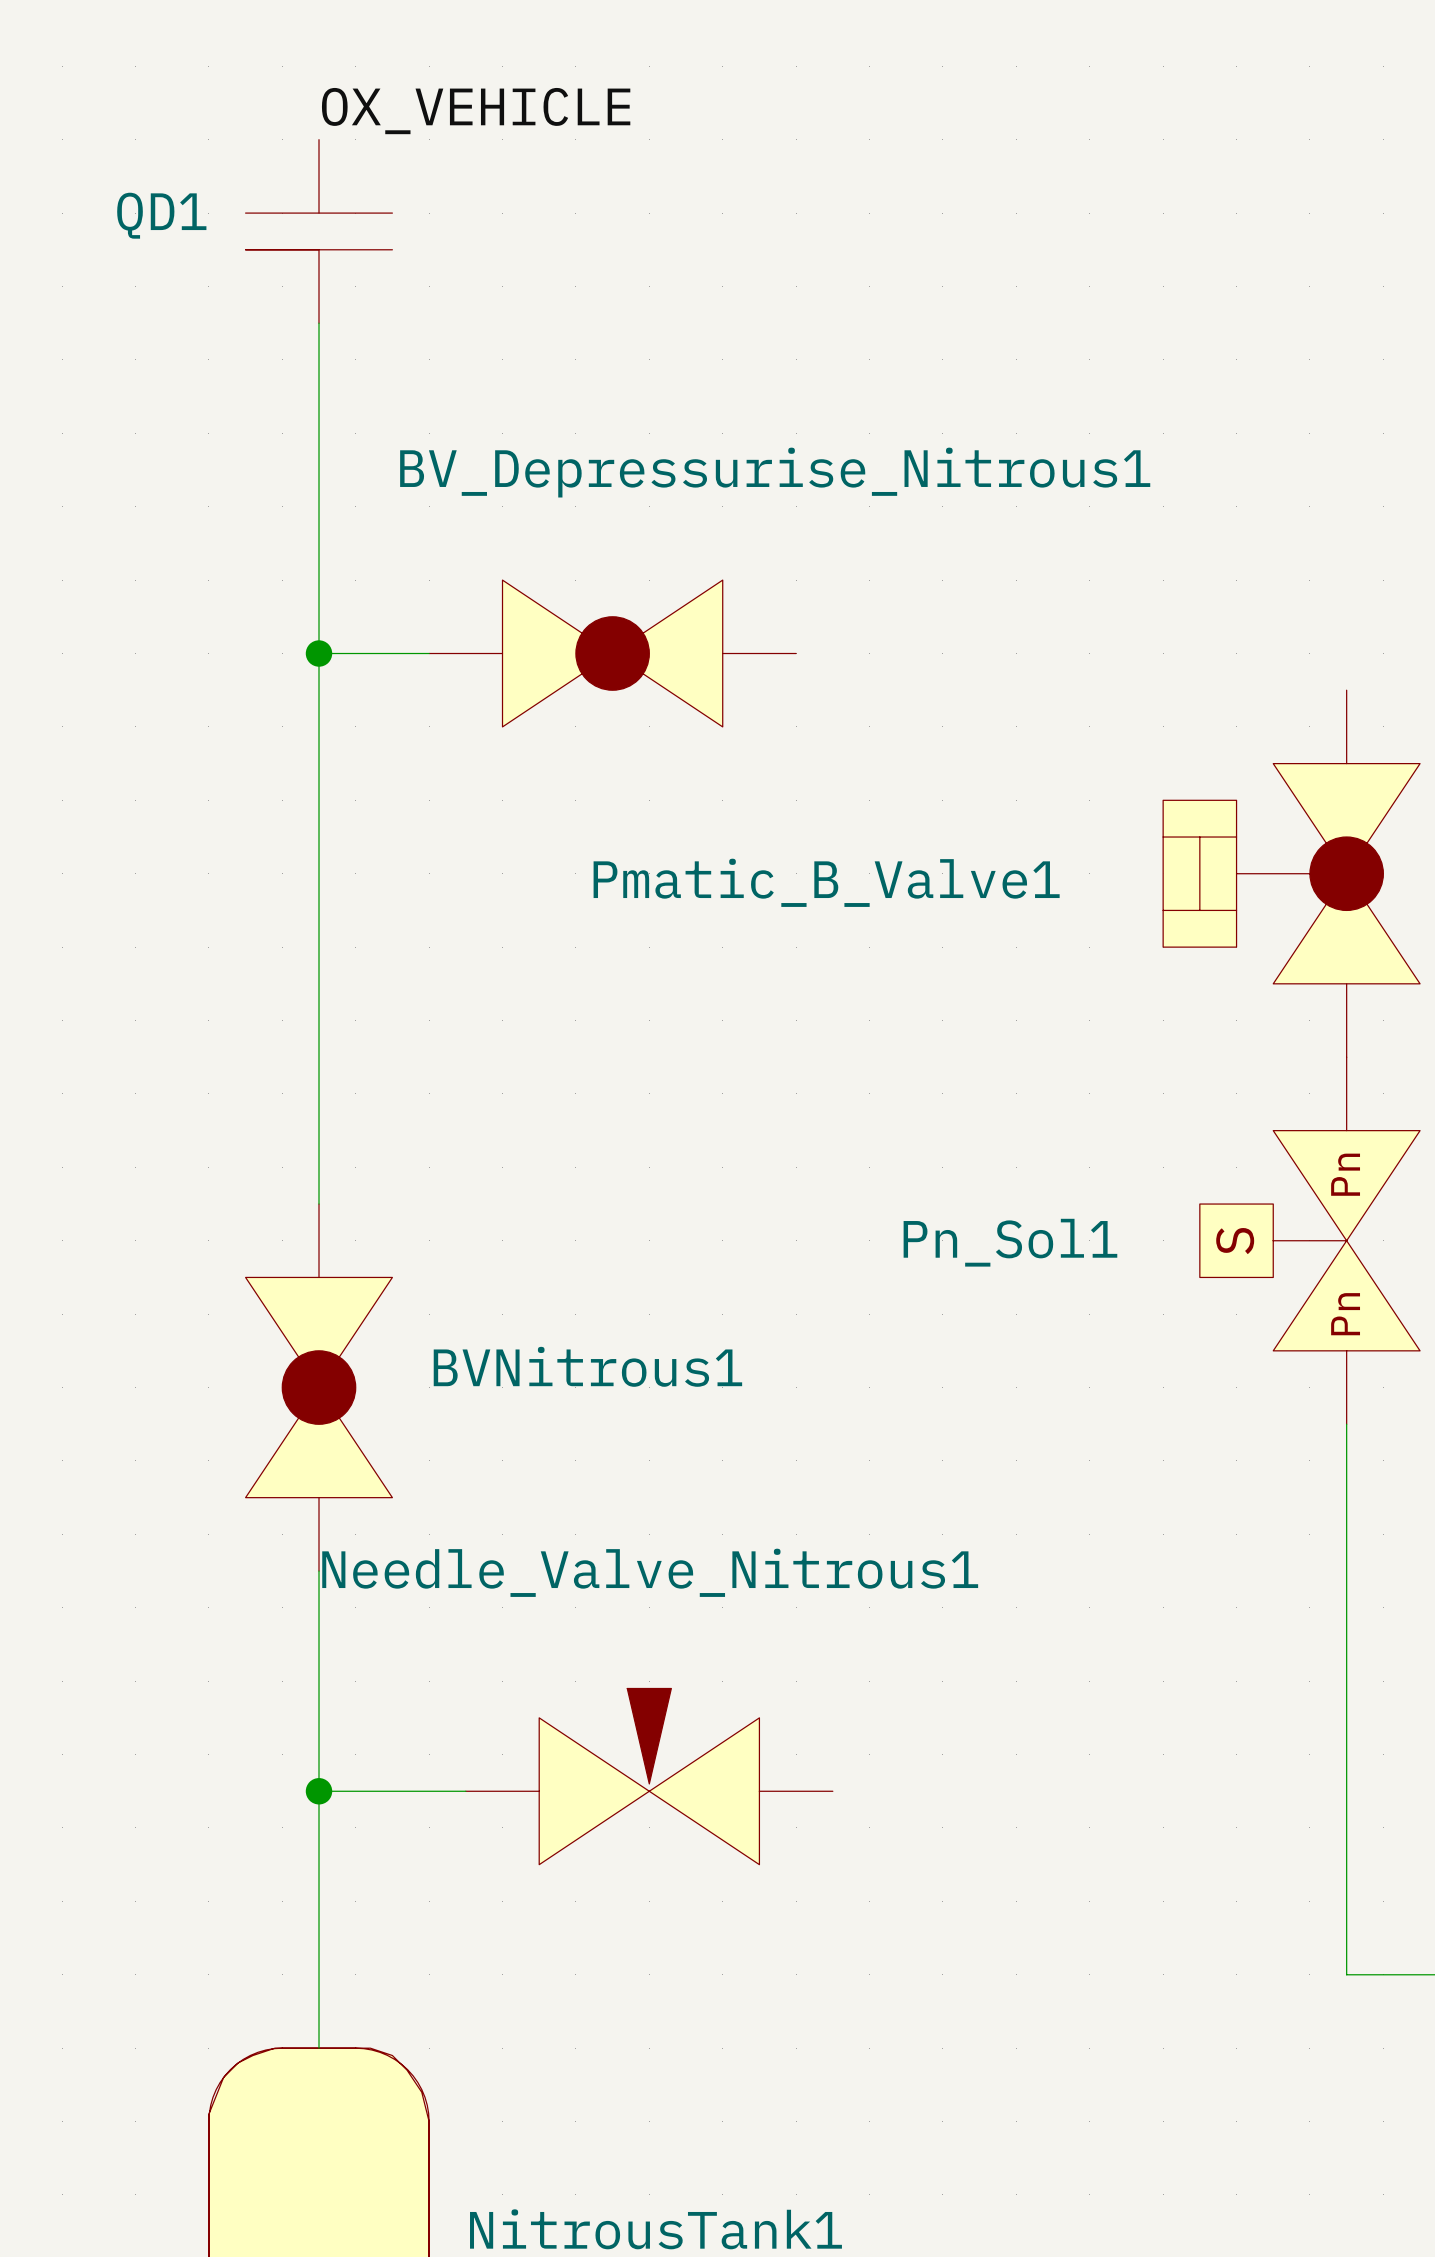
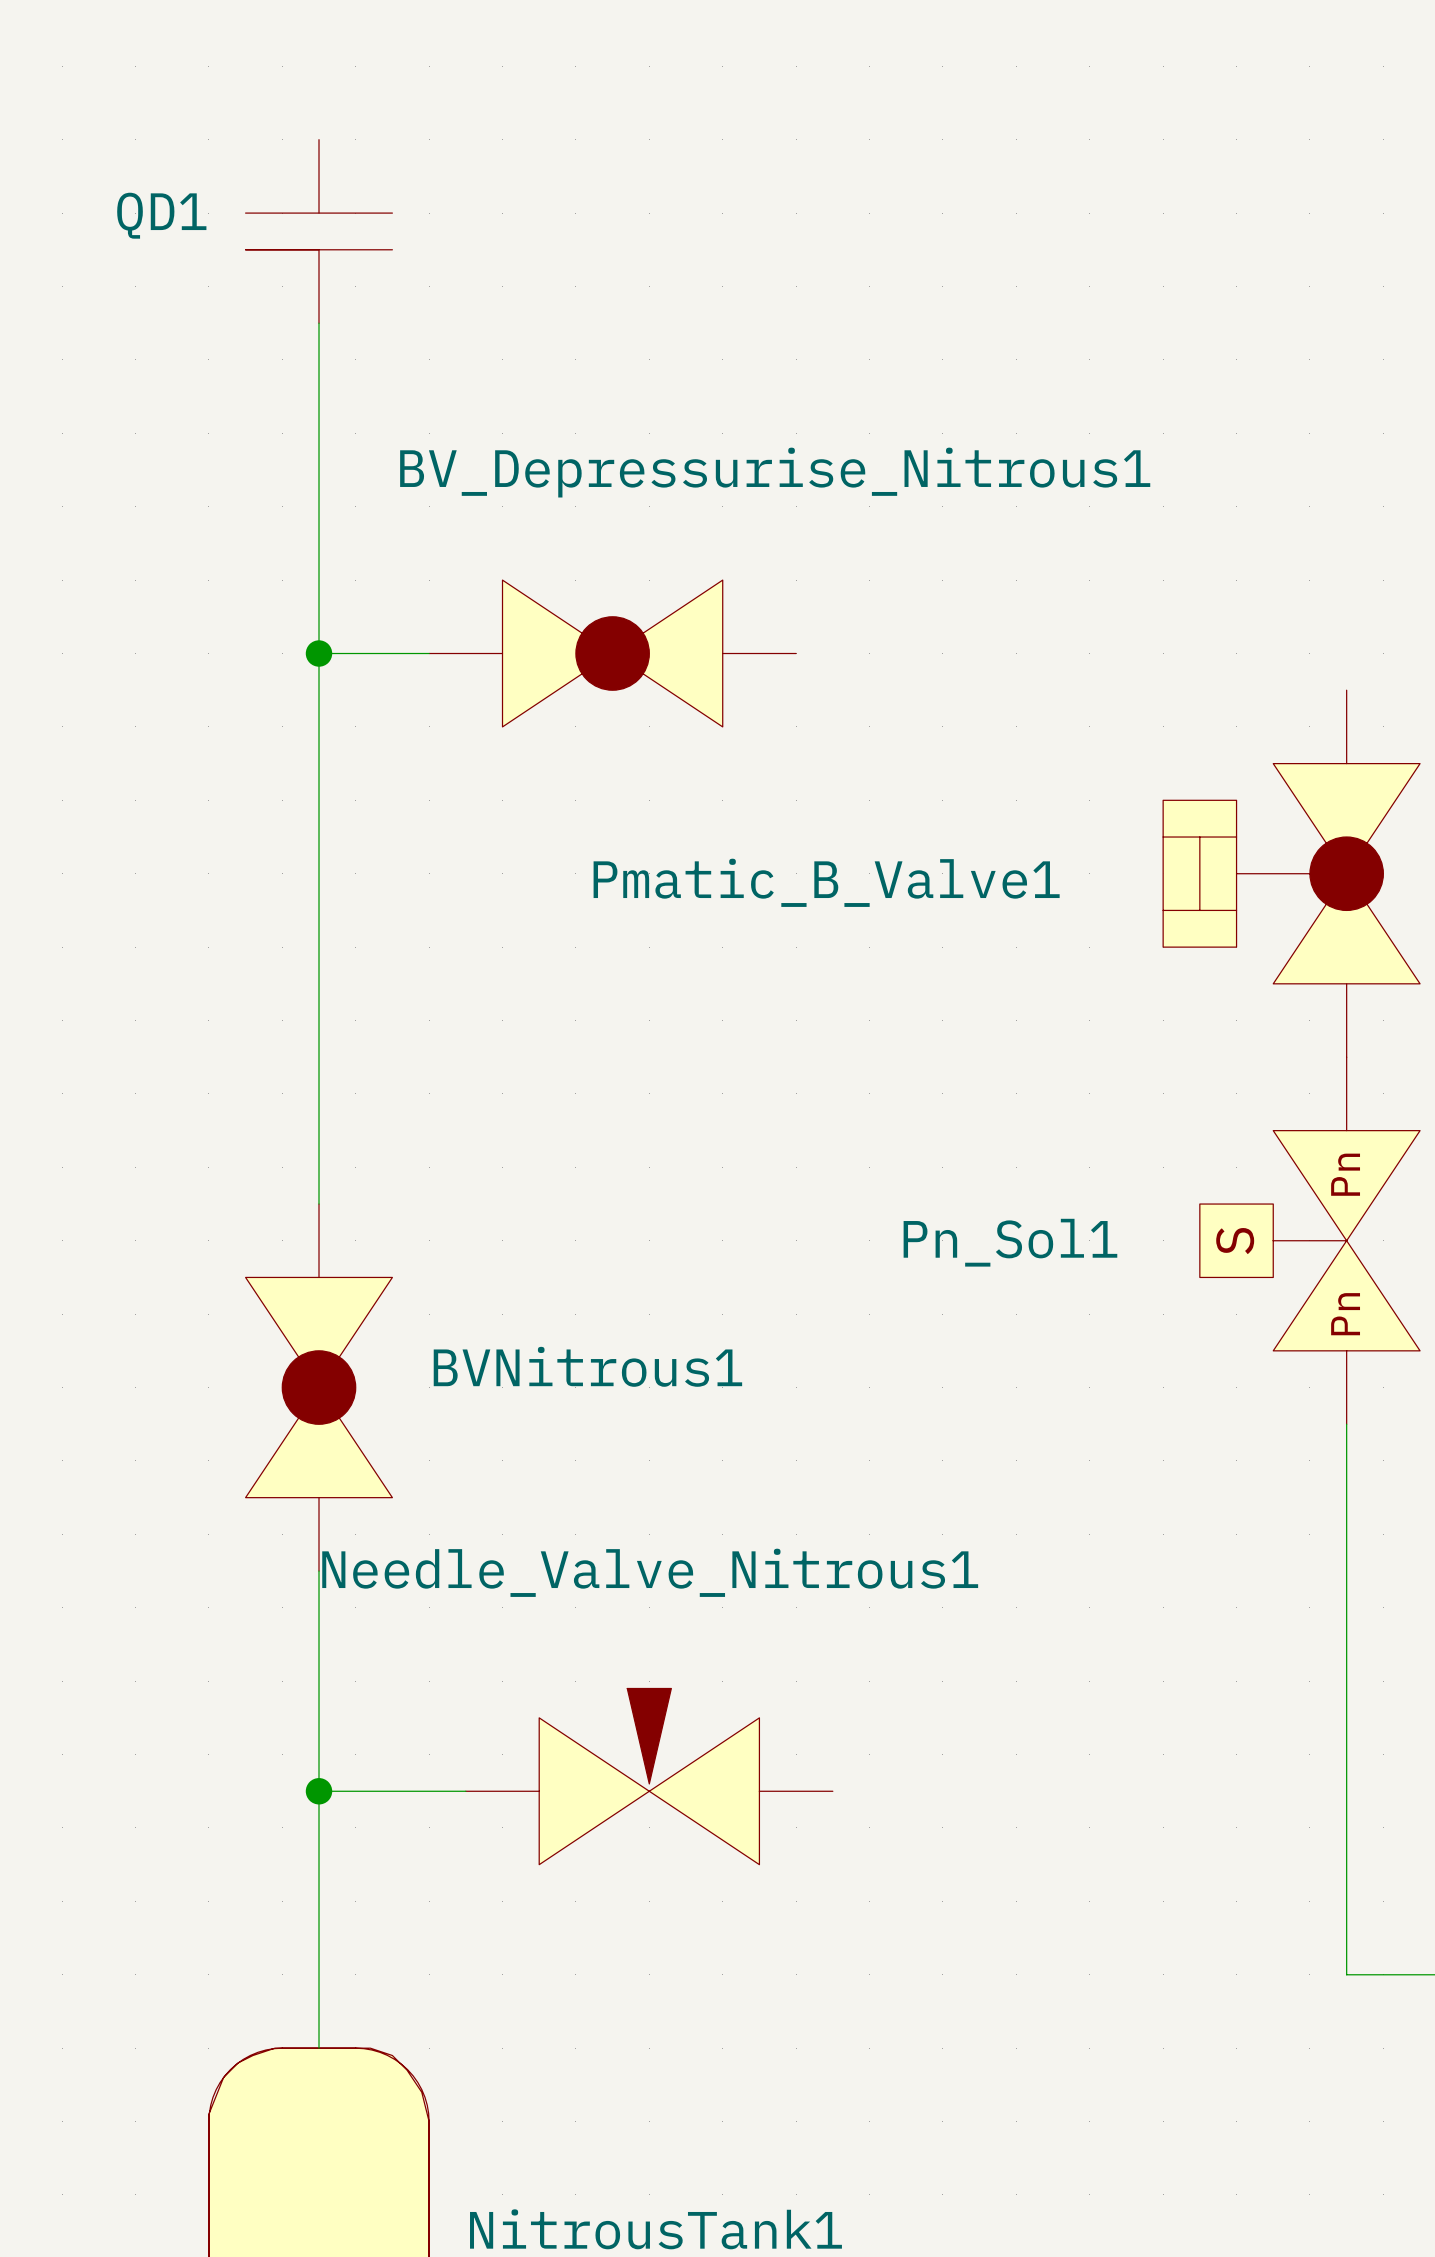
label: OX_VEHICLE (476, 111) -> none

